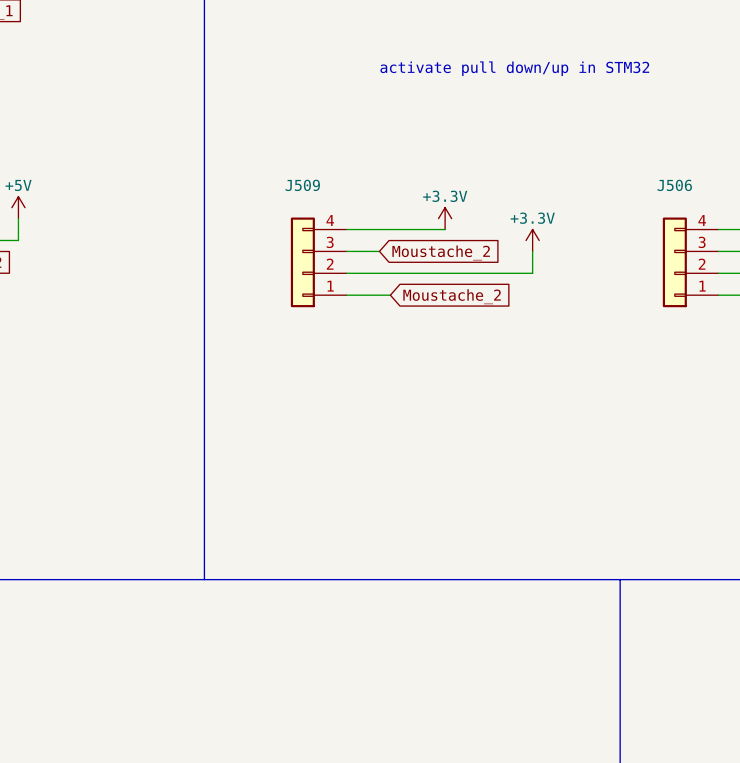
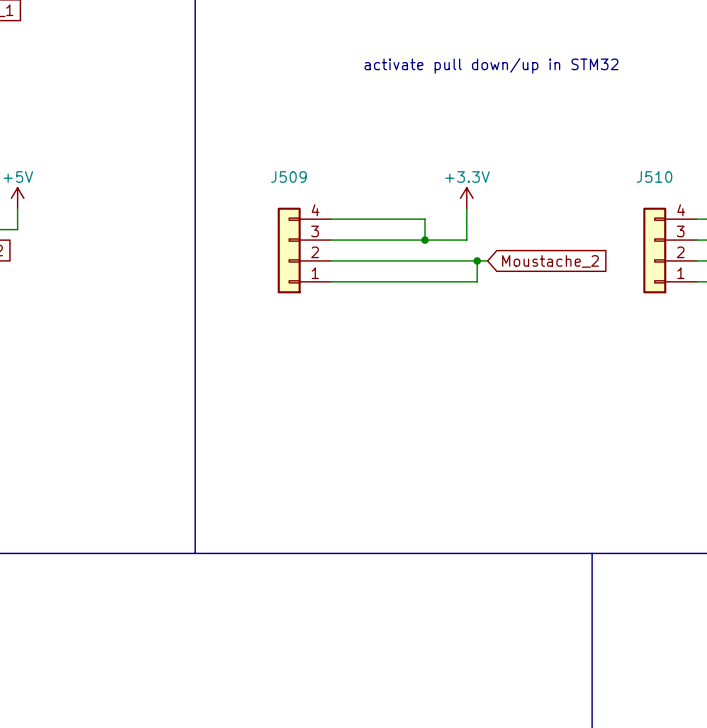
power symbol: none -> +3.3V (466, 198)
power symbol: +3.3V (445, 218) -> none
wire: none -> (466, 208) (466, 240) (362, 240)
wire: none -> (424, 219) (424, 240)
power symbol: +3.3V (532, 240) -> none
junction: none -> (424, 240)
wire: (532, 251) (532, 273) (510, 273) -> none
global label: Moustache_2 (441, 252) -> none
J506: (690, 262) -> none
J510: none -> (669, 250)
wire: none -> (477, 260) (477, 281) (372, 281)
junction: none -> (477, 260)
global label: none -> Moustache_2 (550, 261)
global label: Moustache_2 (452, 296) -> none

